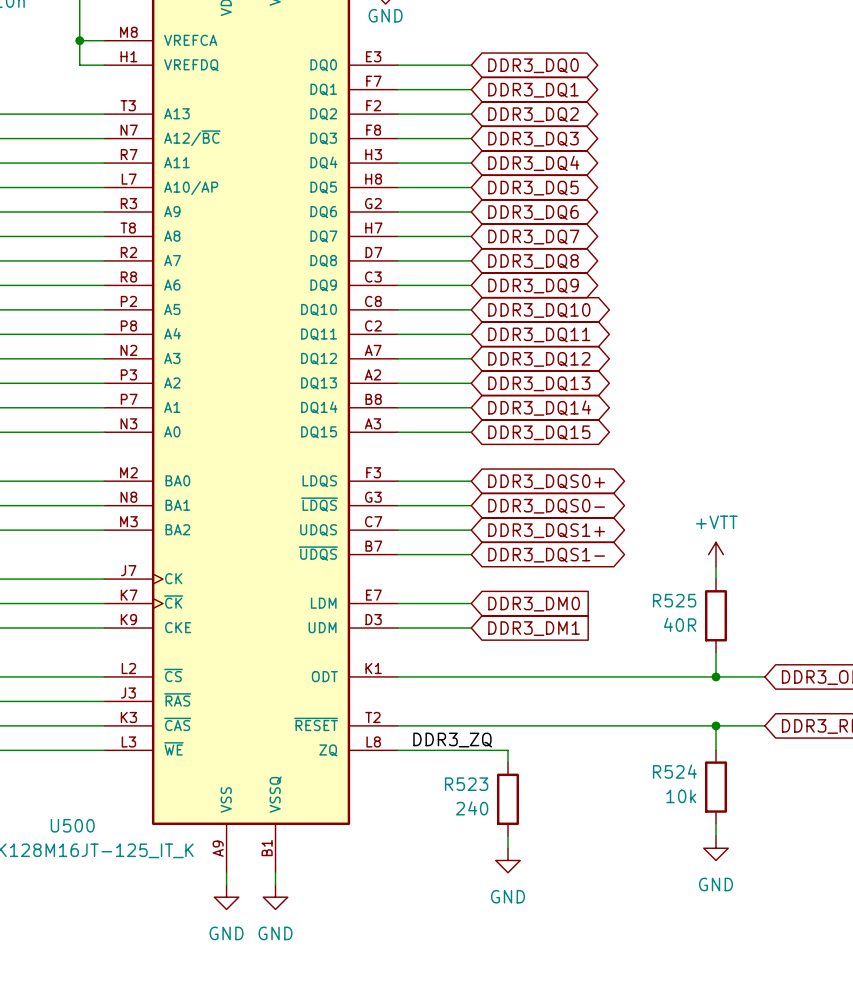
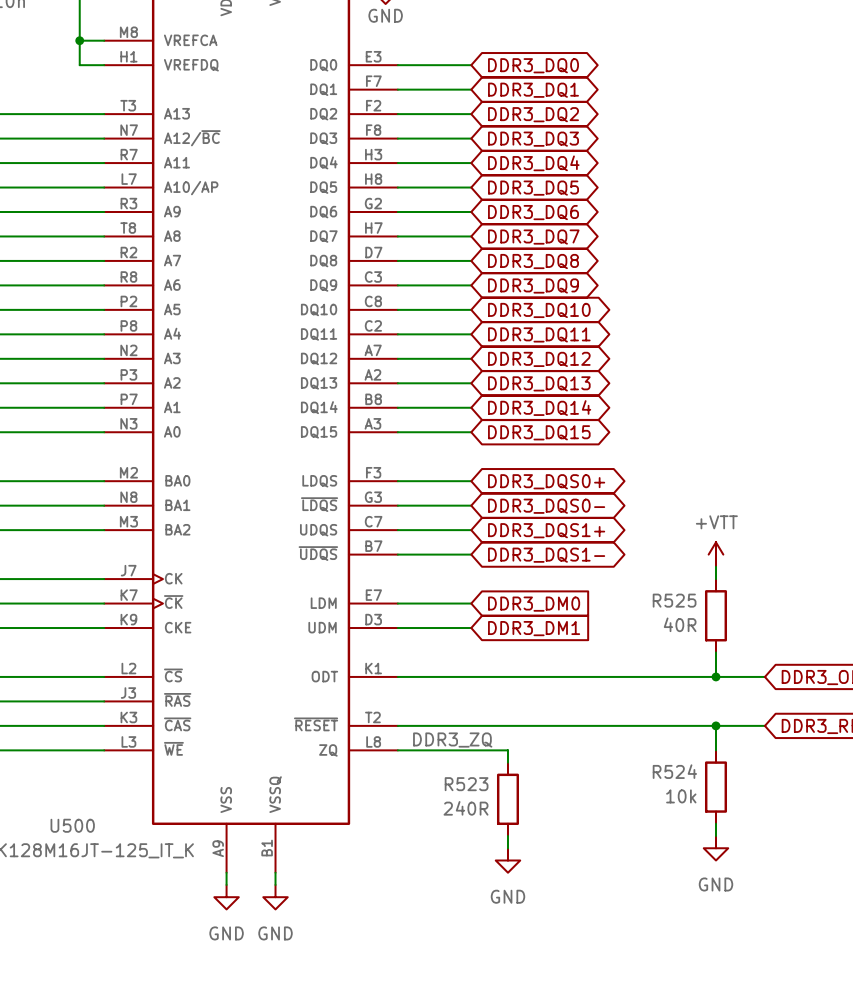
R523 value: 240 (472, 808) -> 240R (466, 808)

